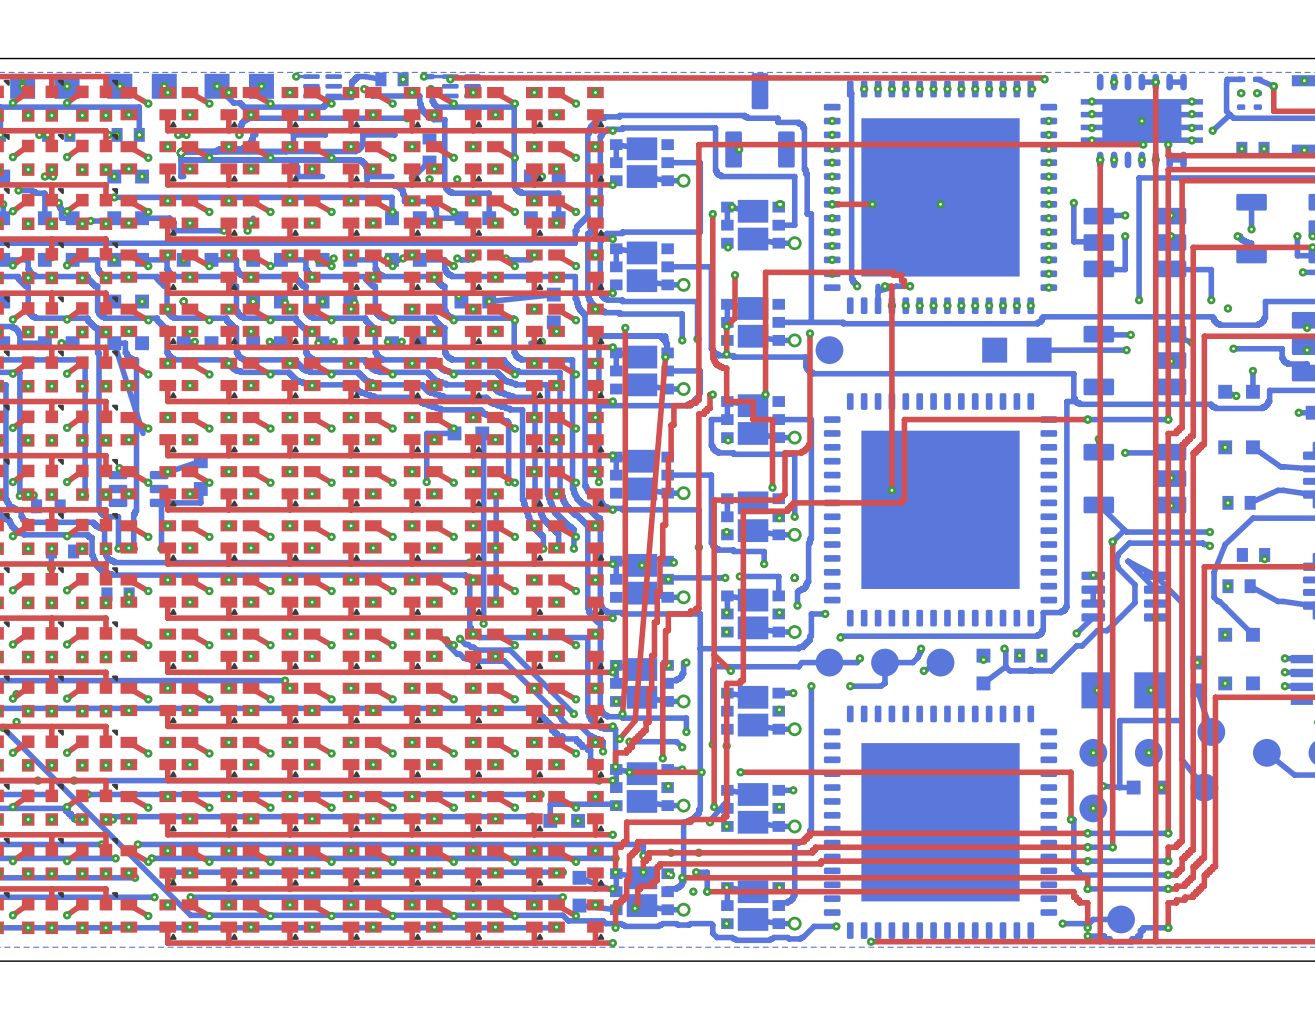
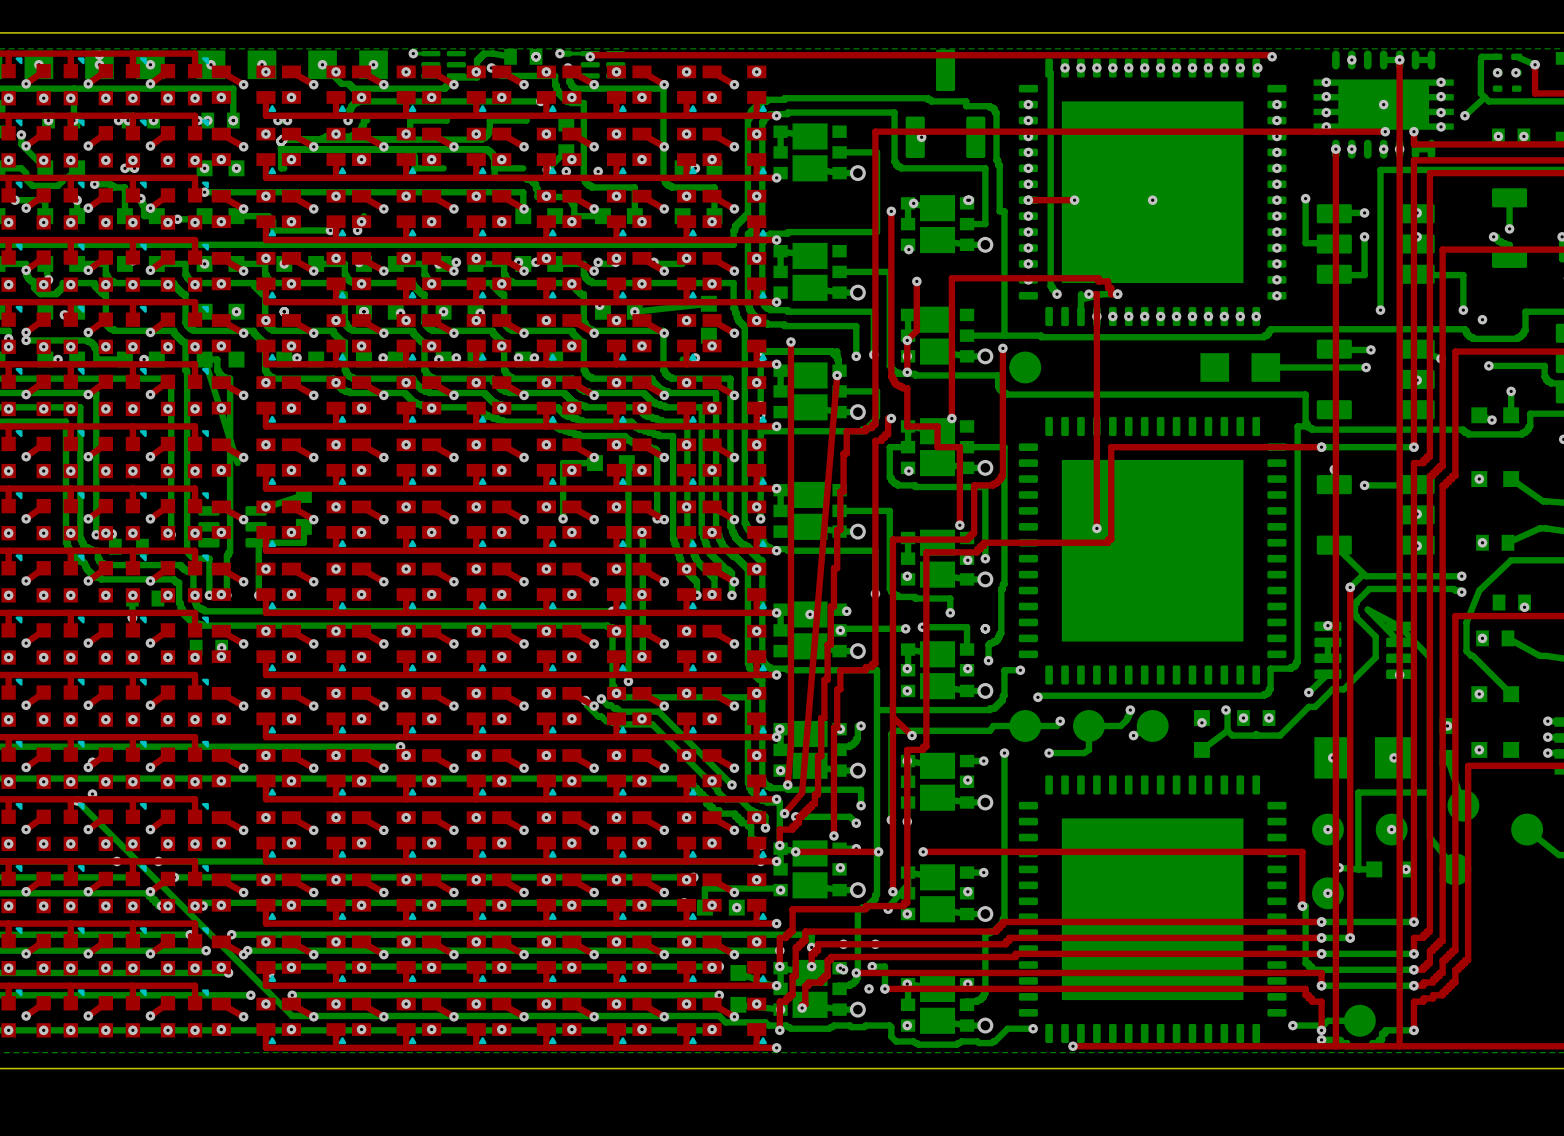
via: (119, 468) -> none

